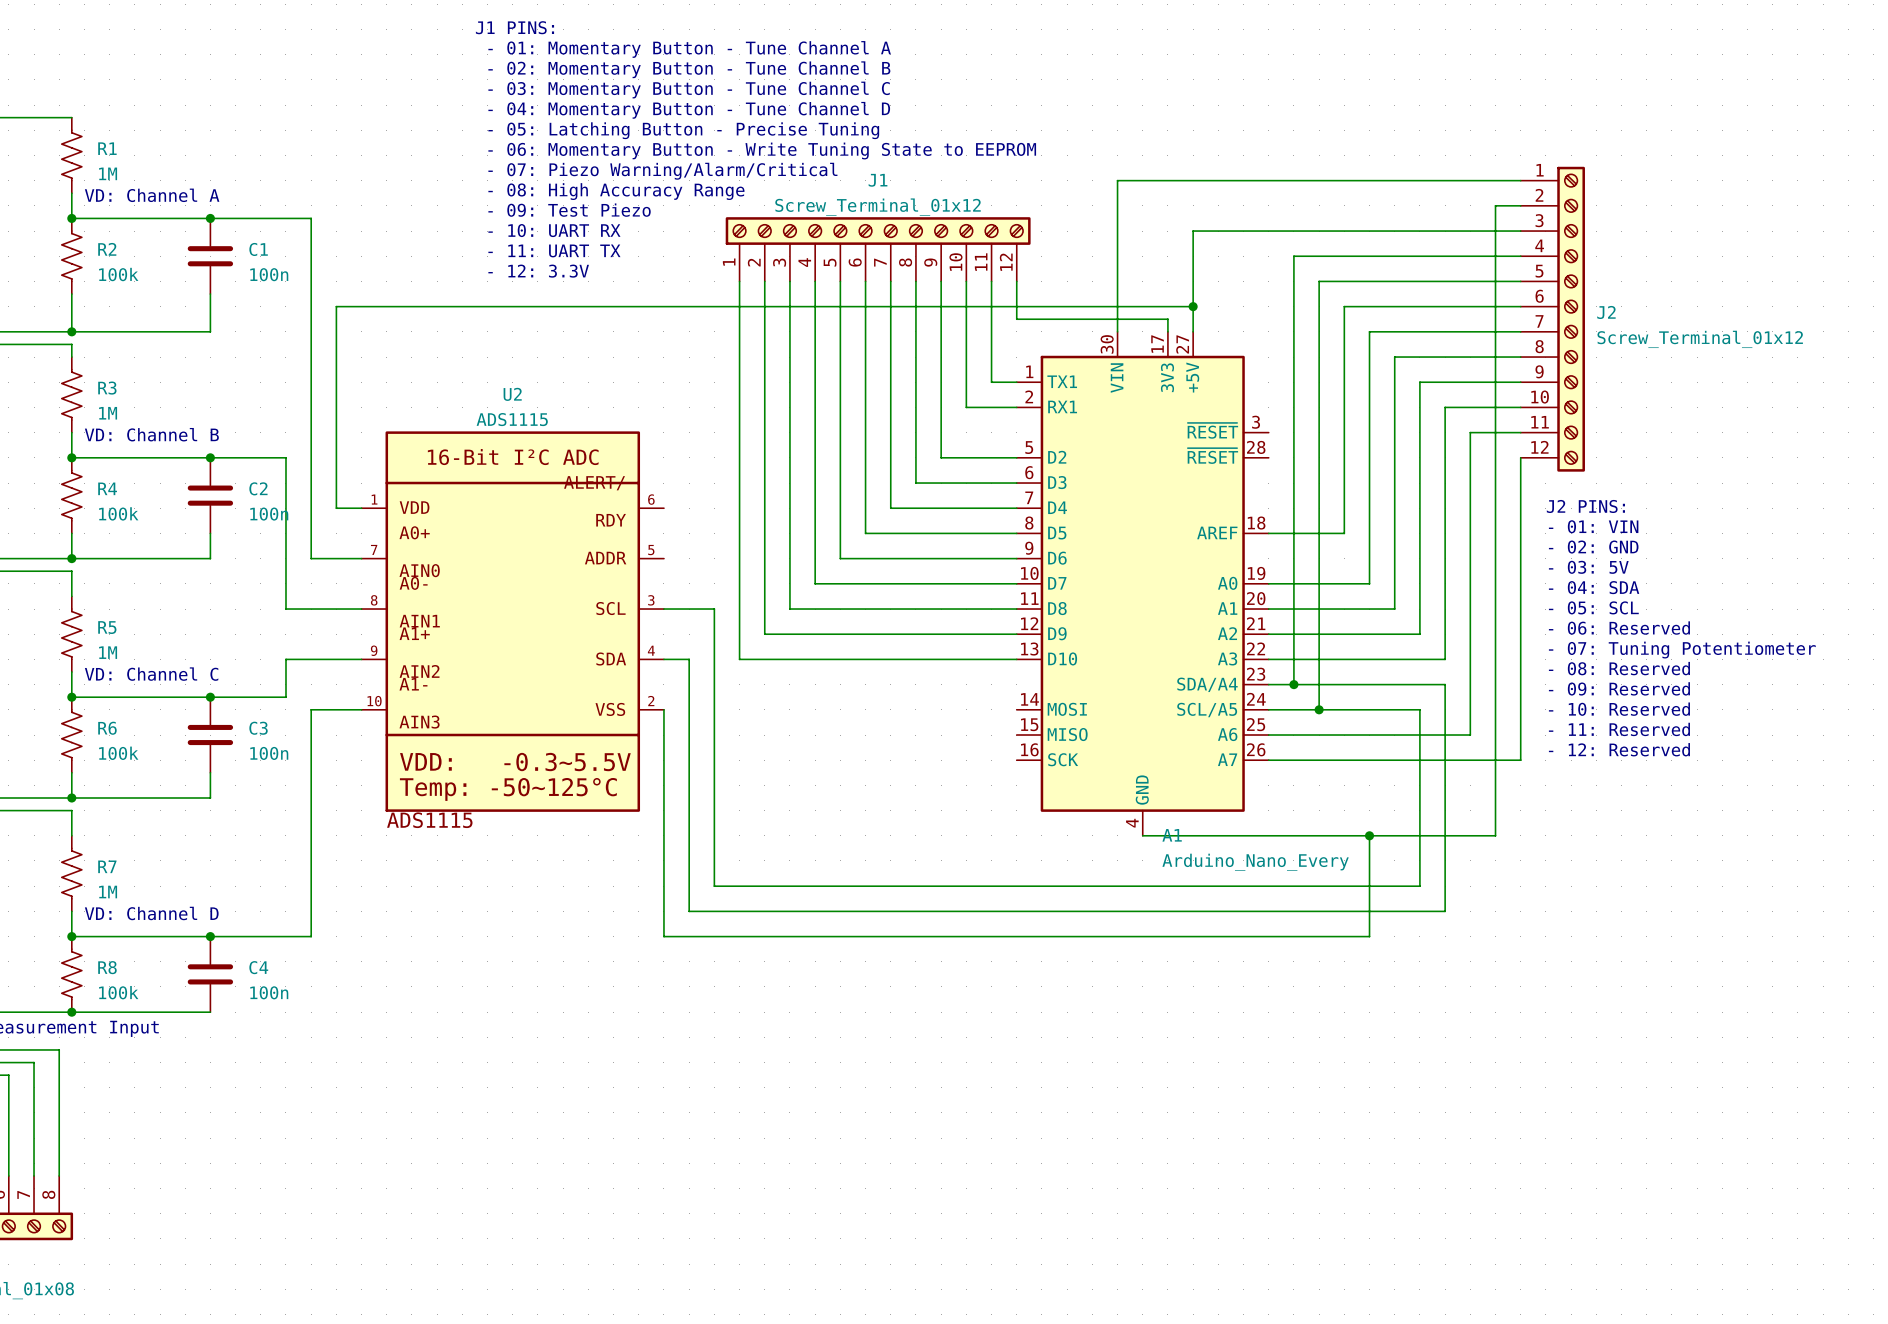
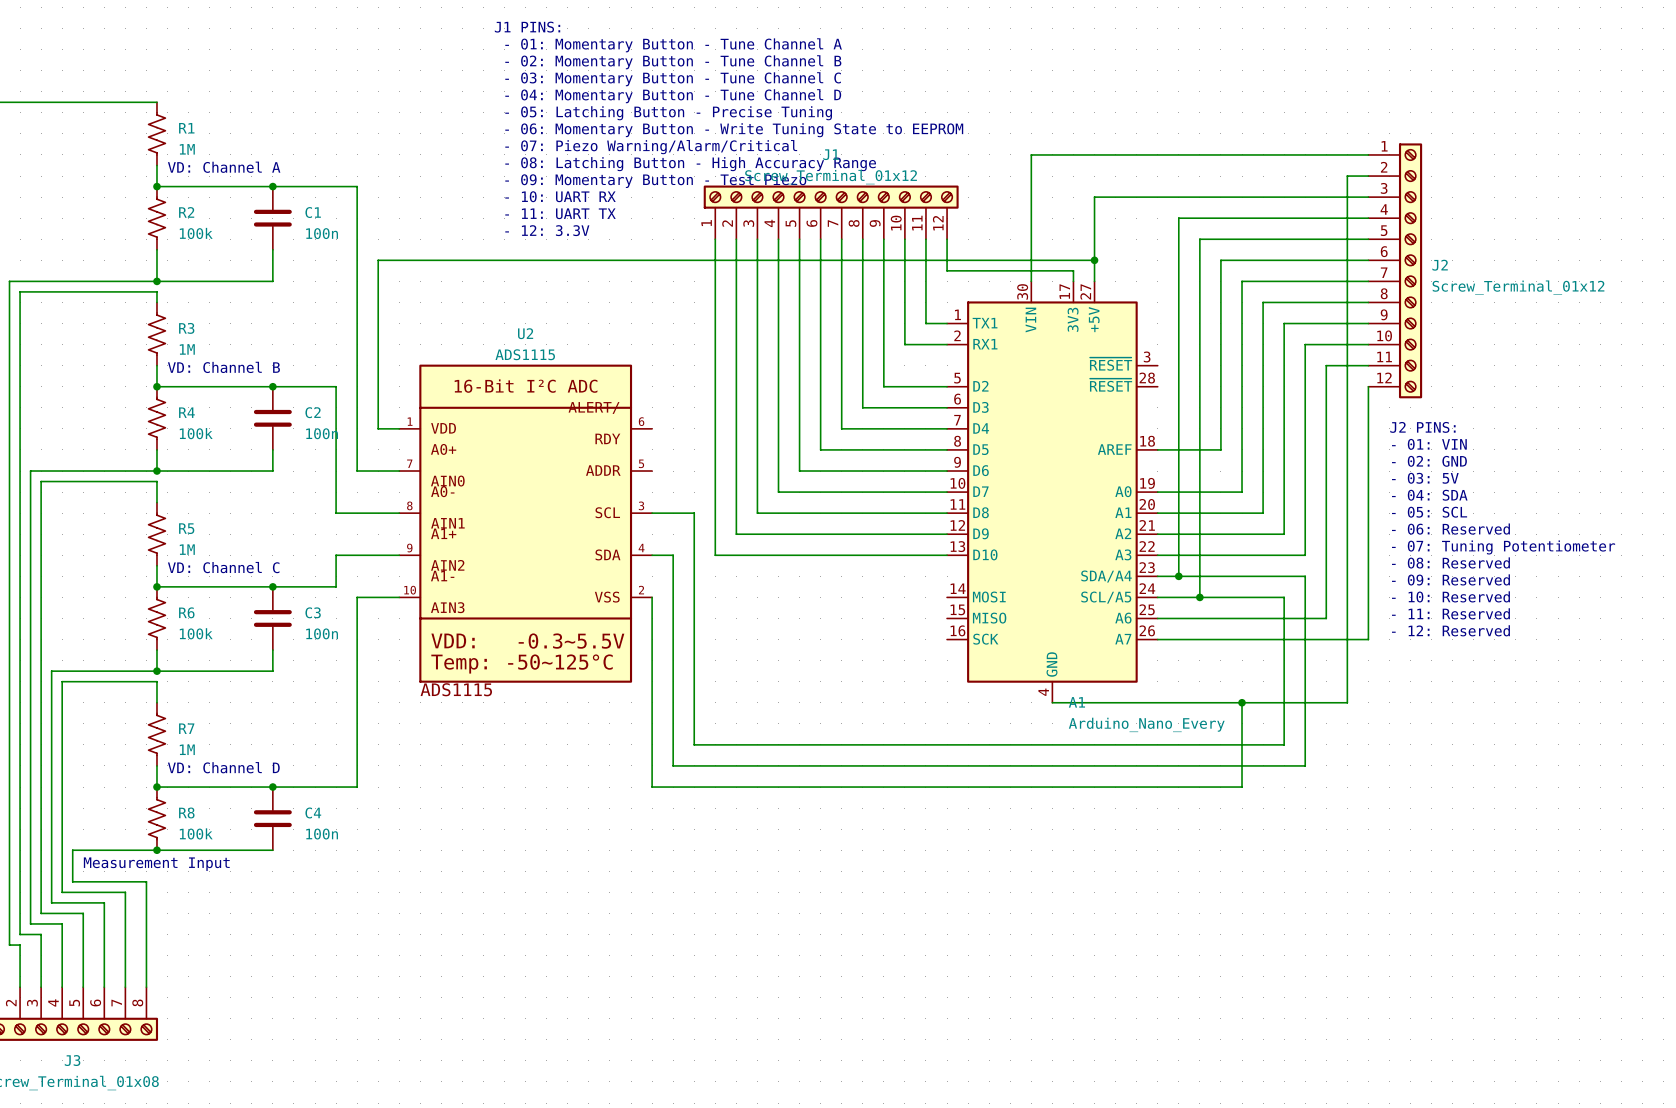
text: - 08: High Accuracy Range (616, 191) -> - 08: Latching Button - High Accuracy Range (690, 164)
text: - 09: Test Piezo (569, 210) -> - 09: Momentary Button - Test Piezo (655, 181)

